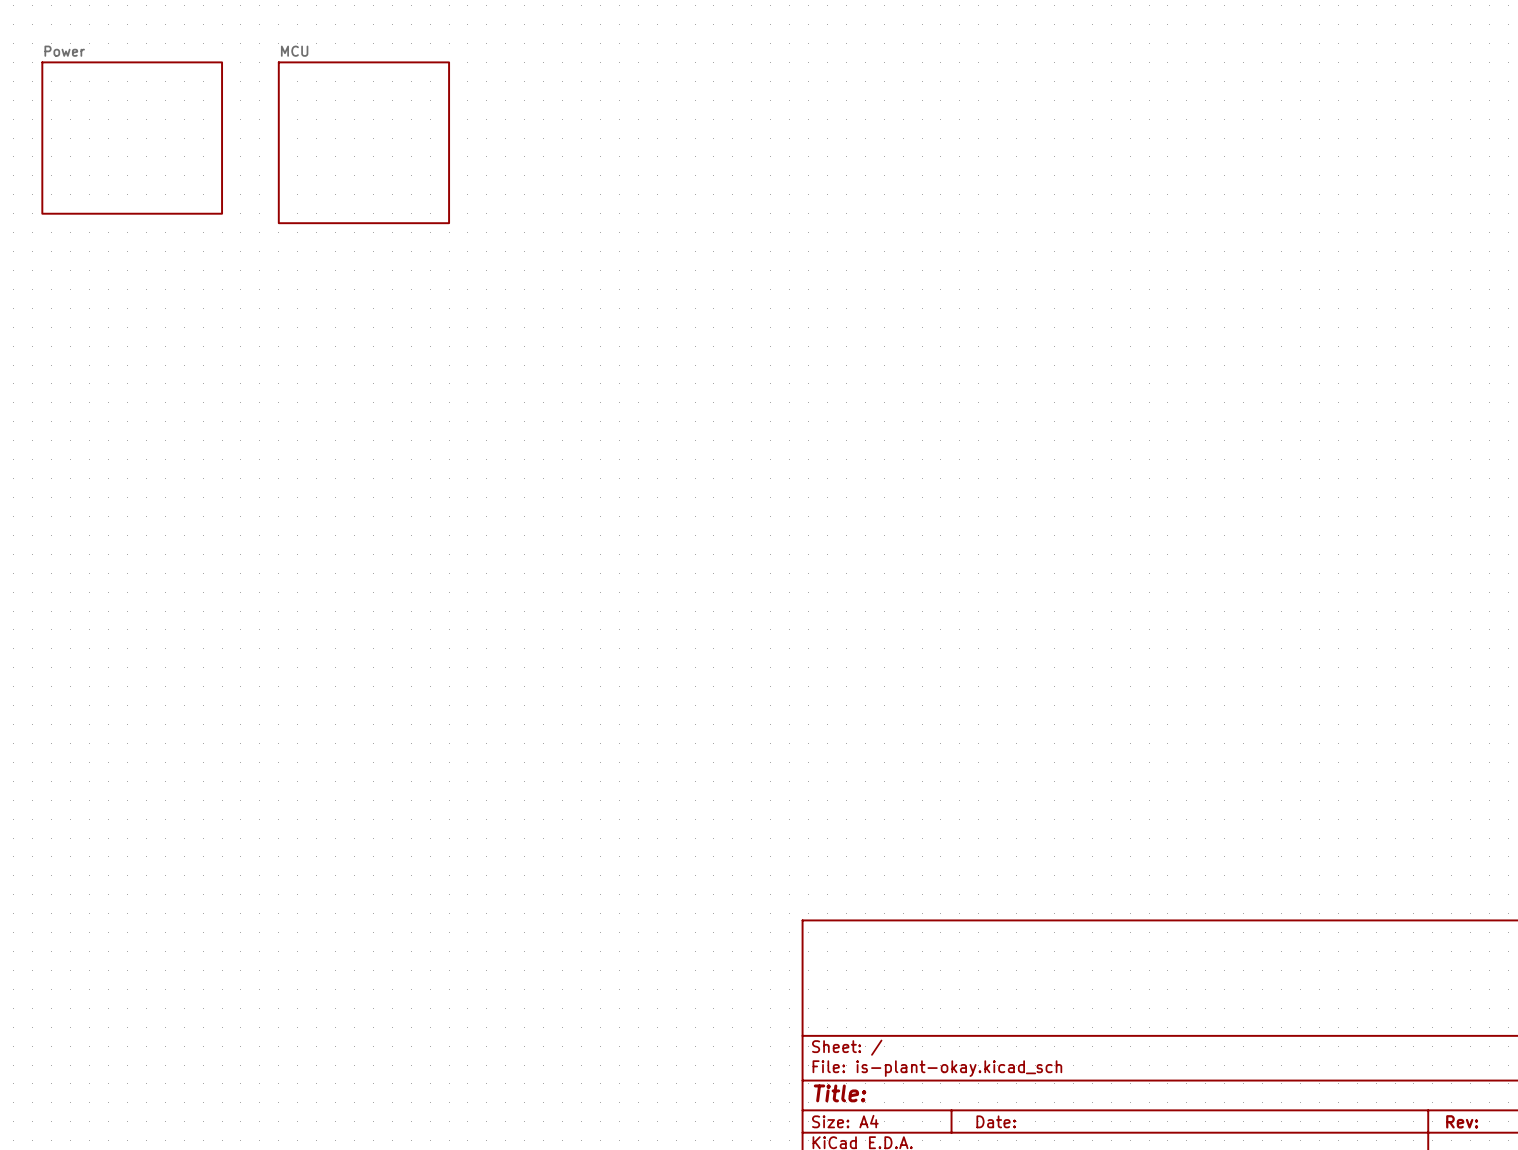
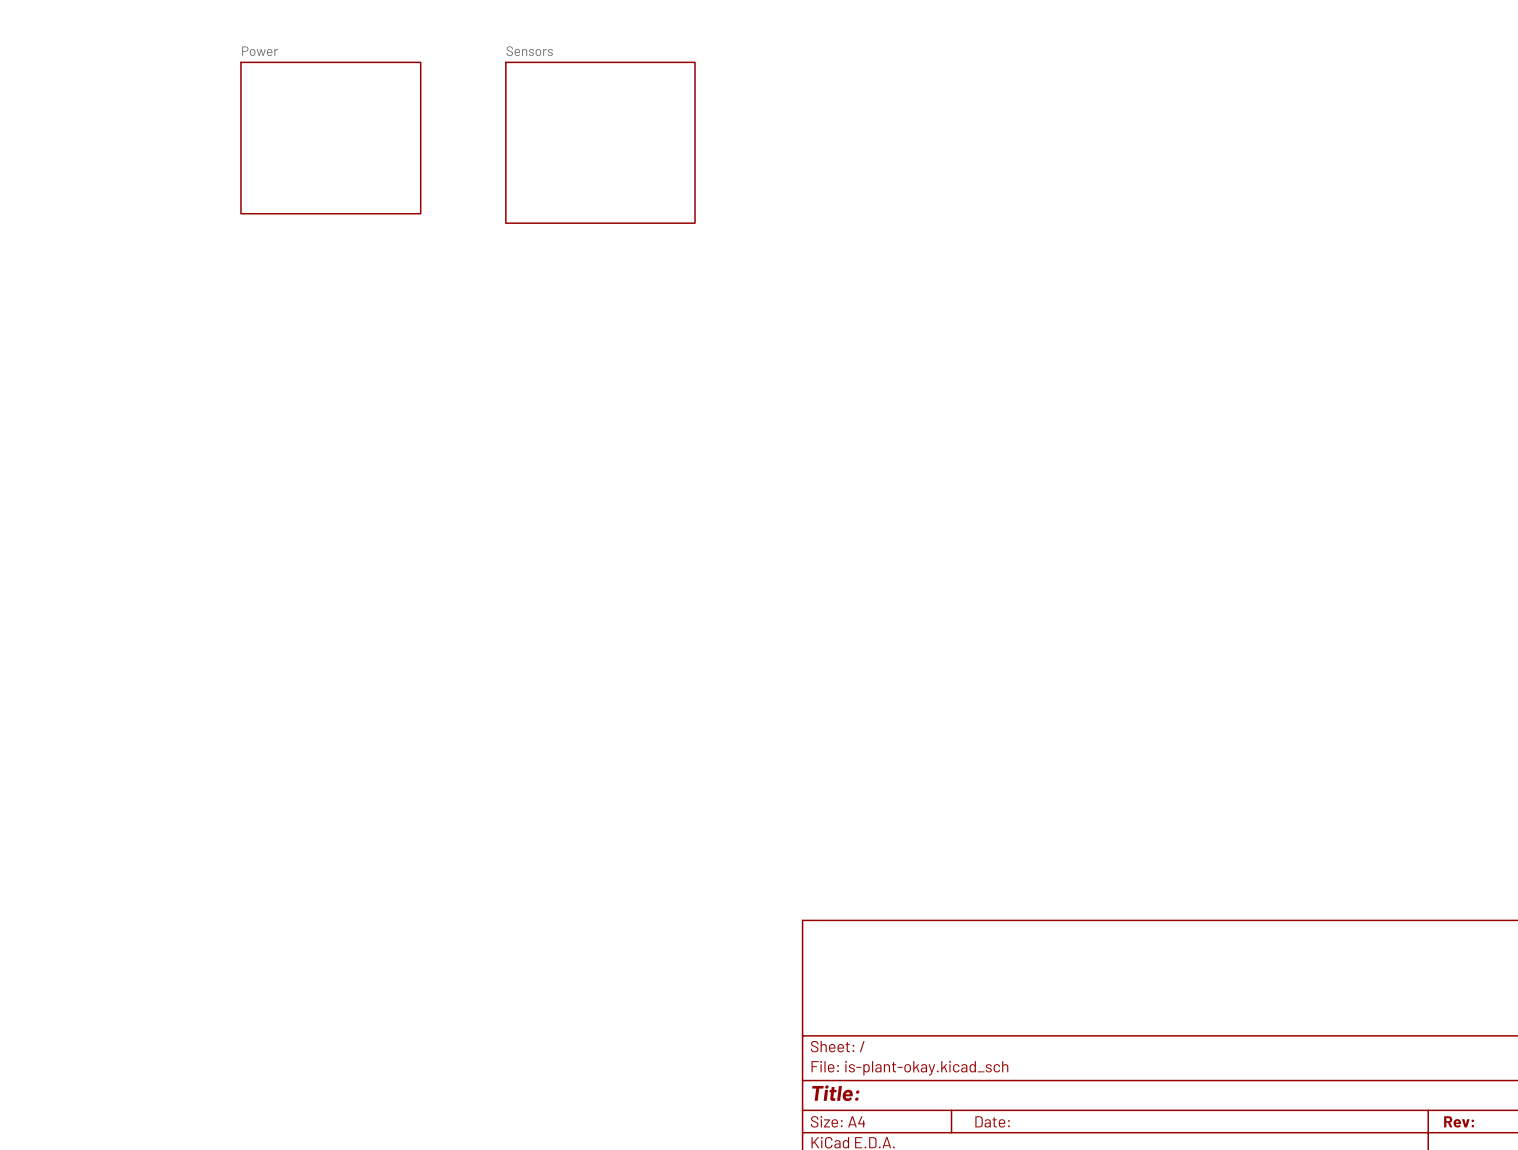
sheet Power: (132, 138) -> none
sheet Power: none -> (330, 138)
sheet MCU: (363, 142) -> none
sheet Sensors: none -> (600, 142)

